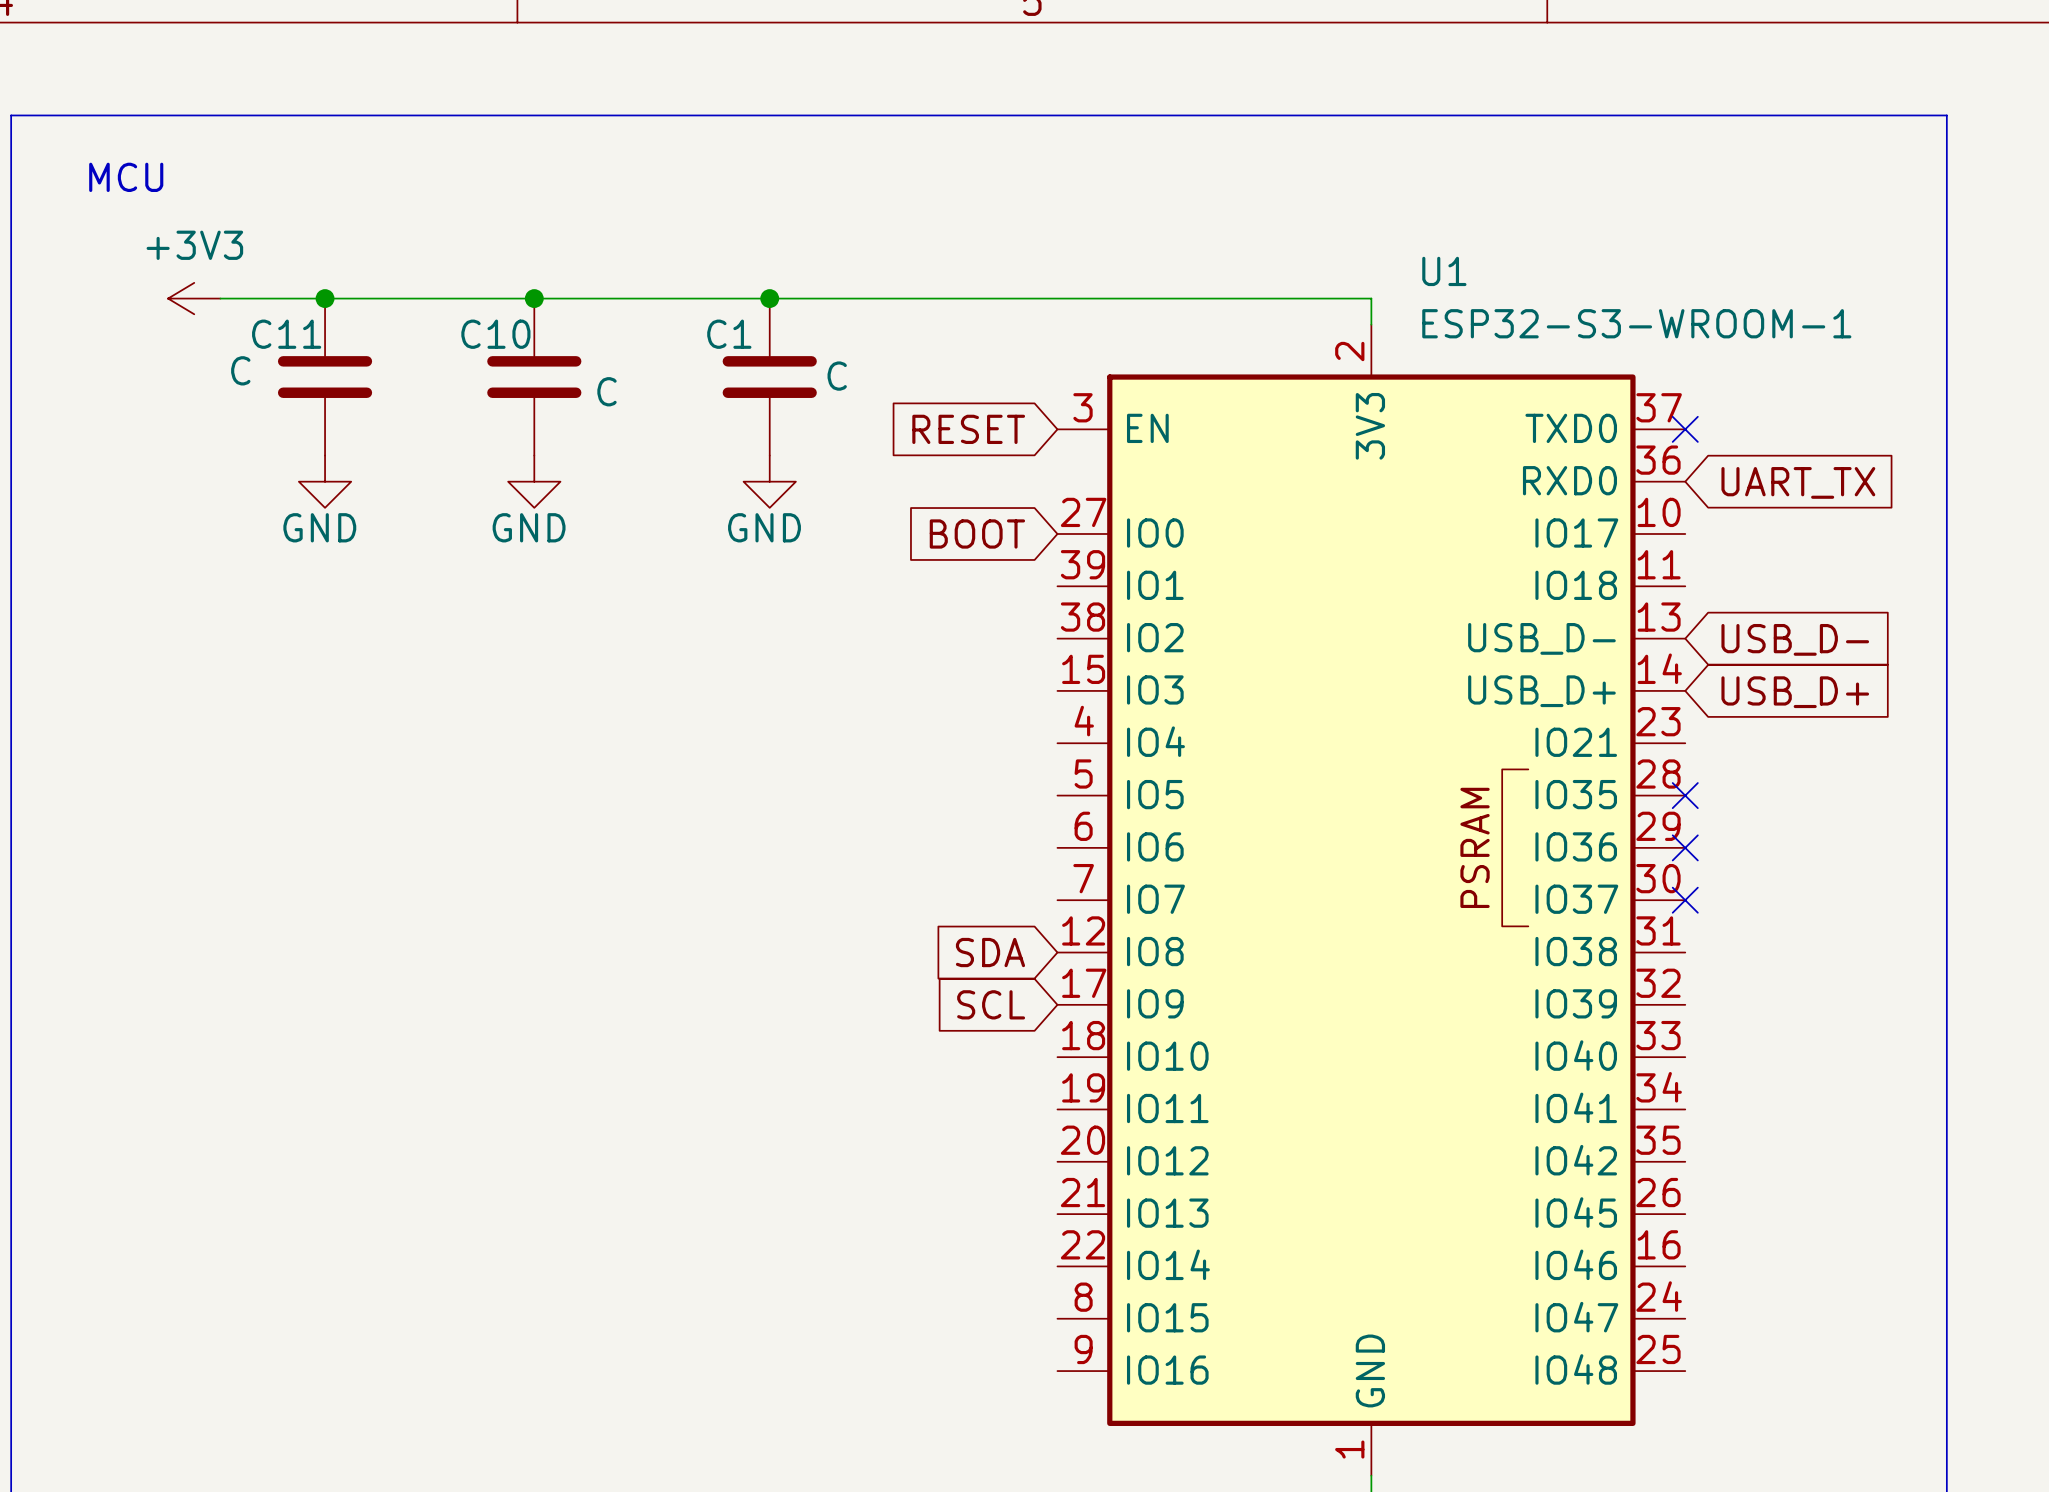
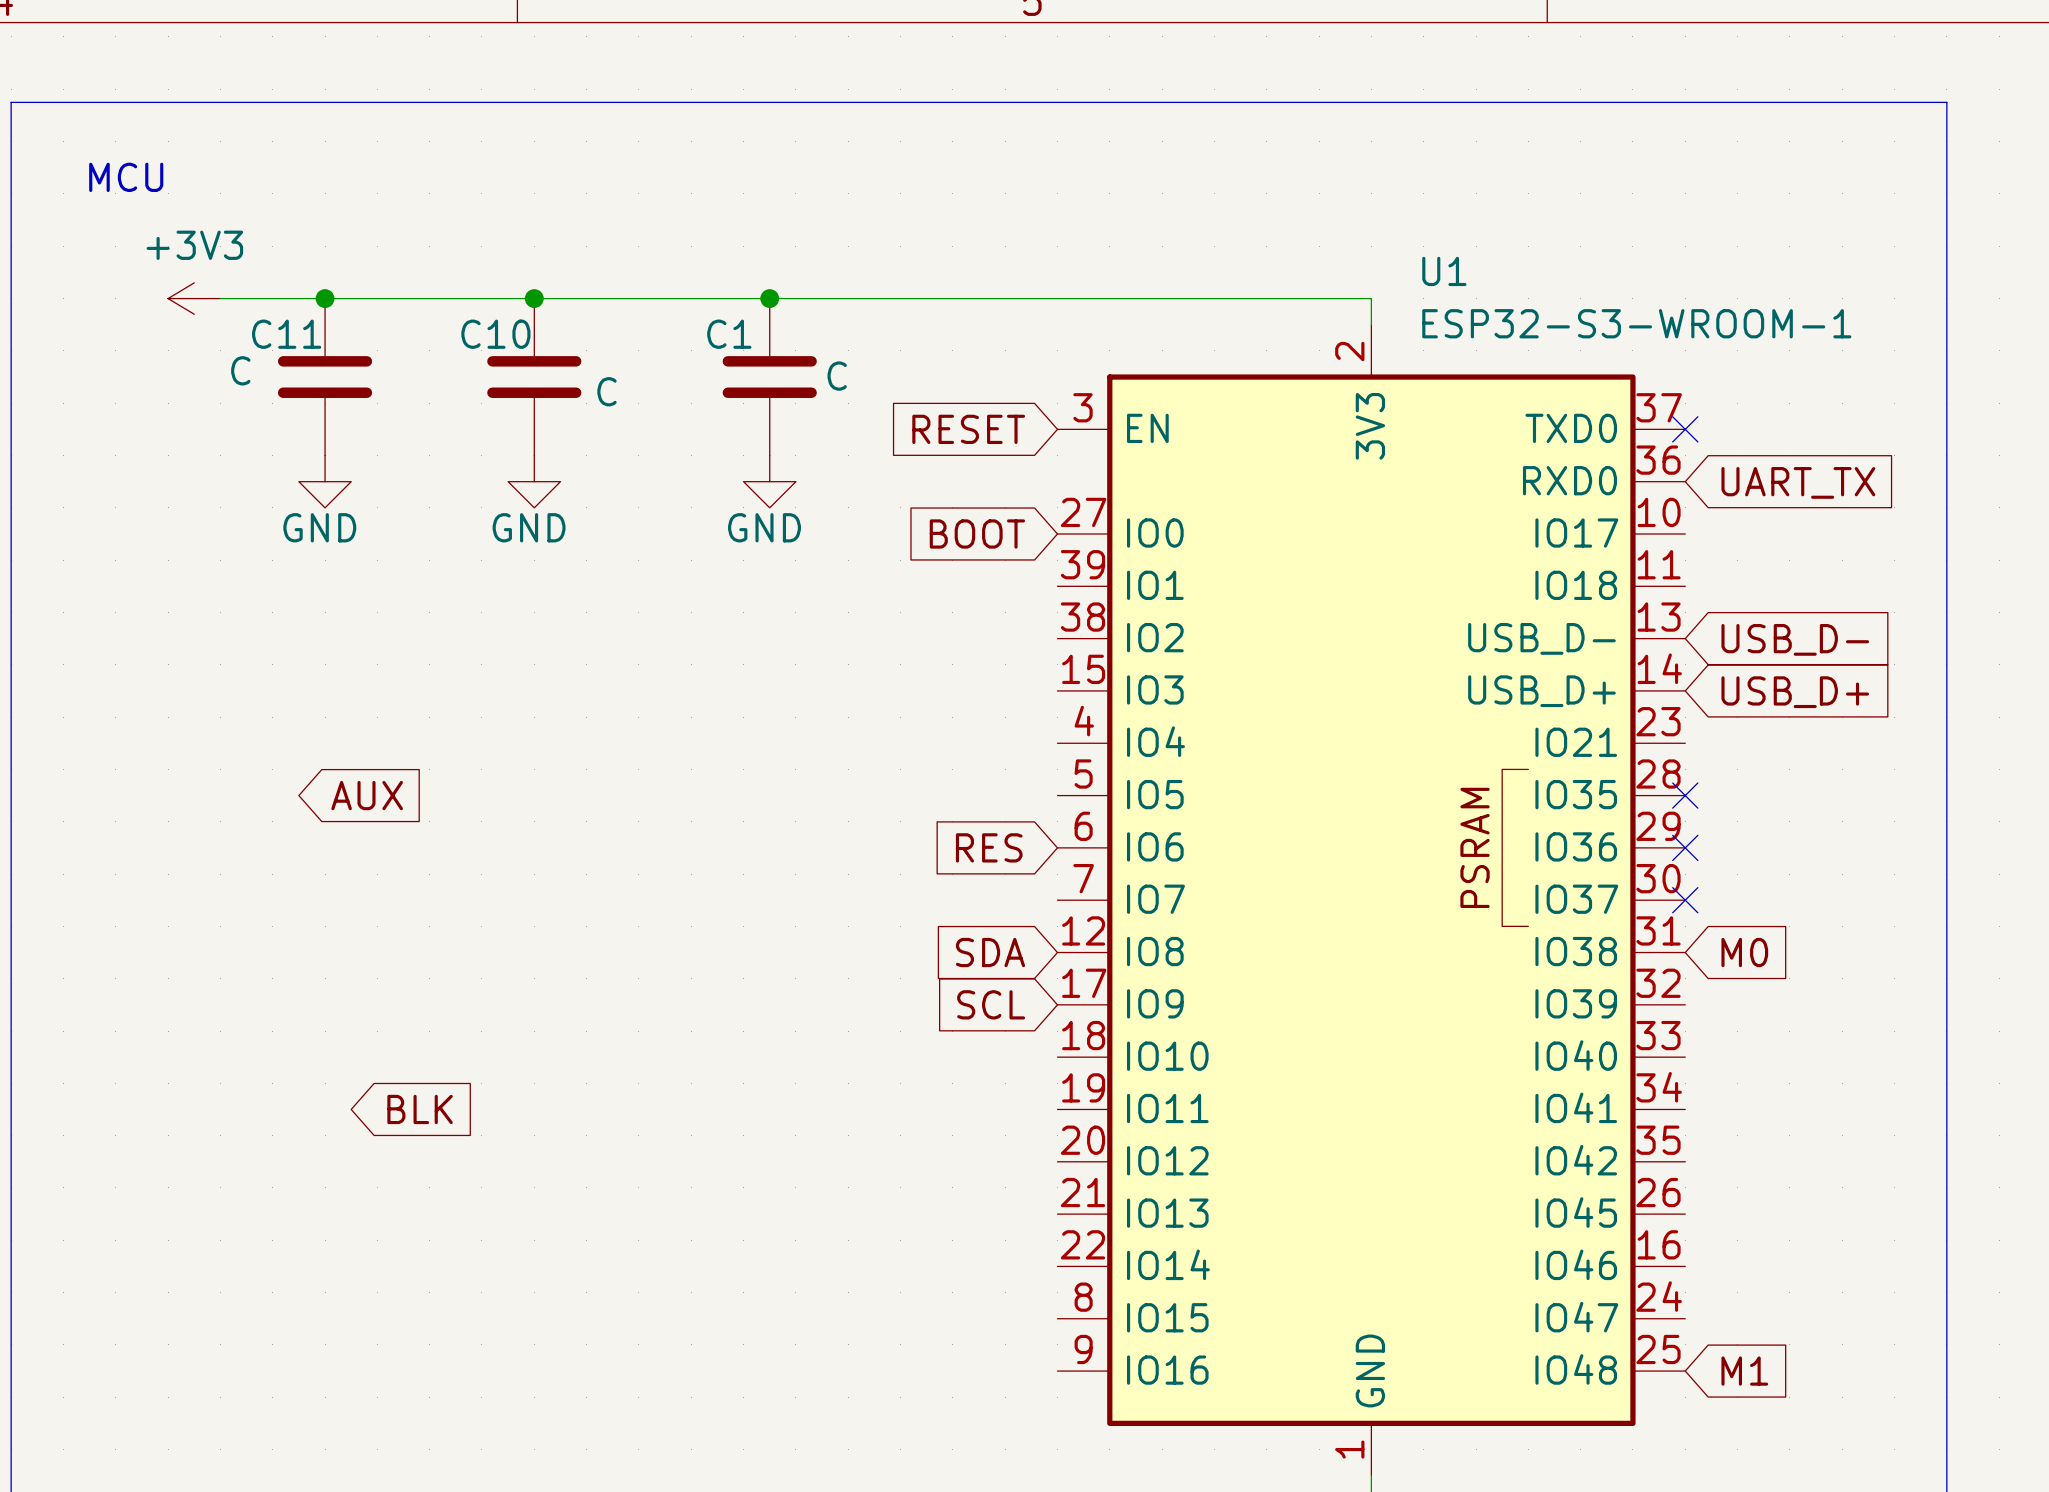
line: (11, 115) (1946, 115) -> (11, 115) (11, 102) (1946, 102) (1946, 115)
global label: none -> AUX (367, 795)
global label: none -> RES (989, 847)
global label: none -> M0 (1744, 952)
global label: none -> BLK (420, 1109)
global label: none -> M1 (1744, 1371)

